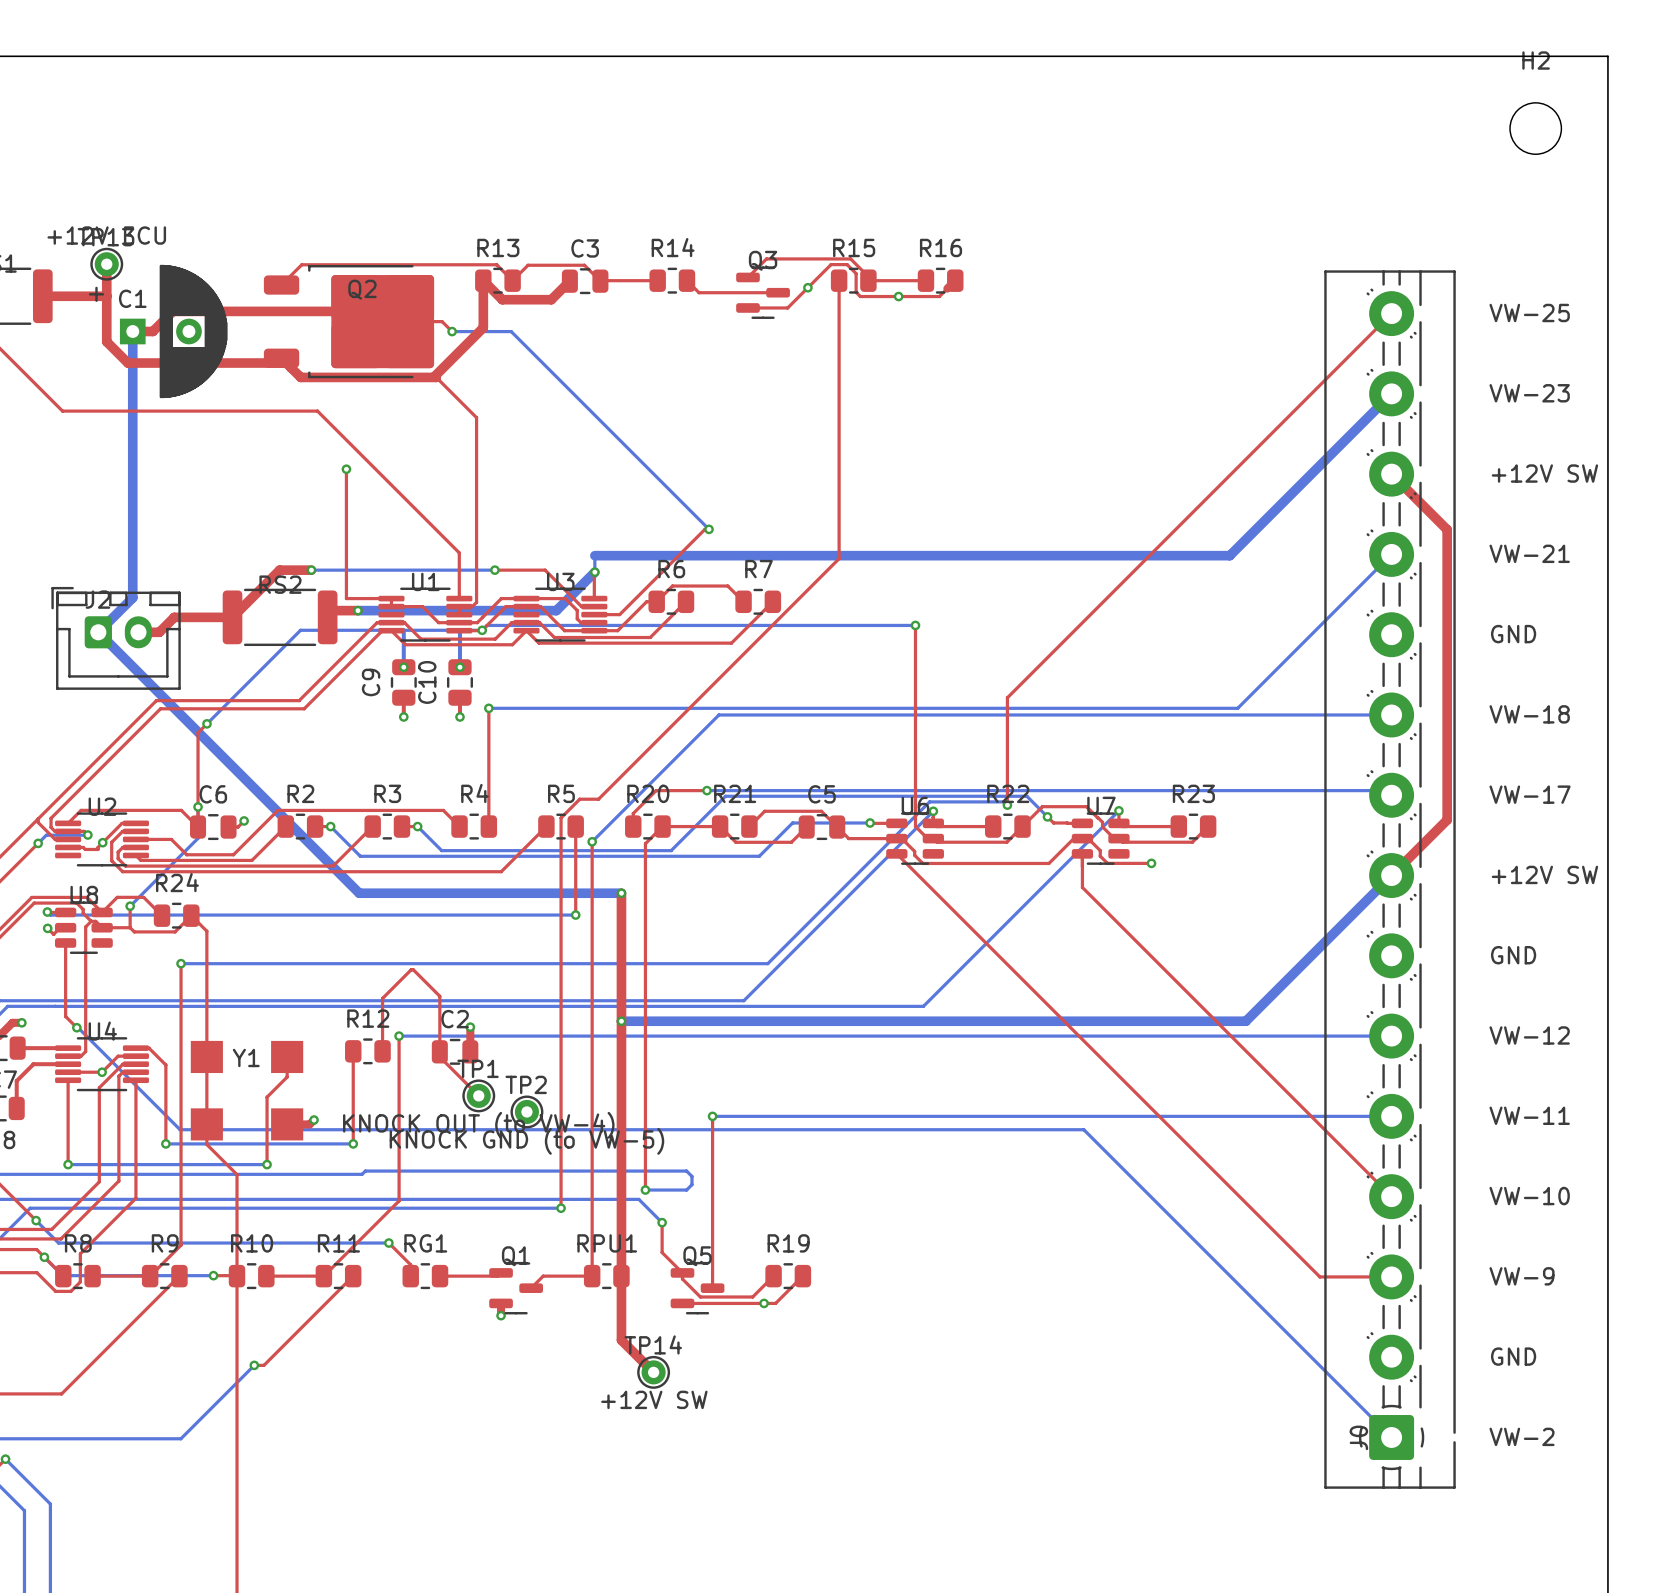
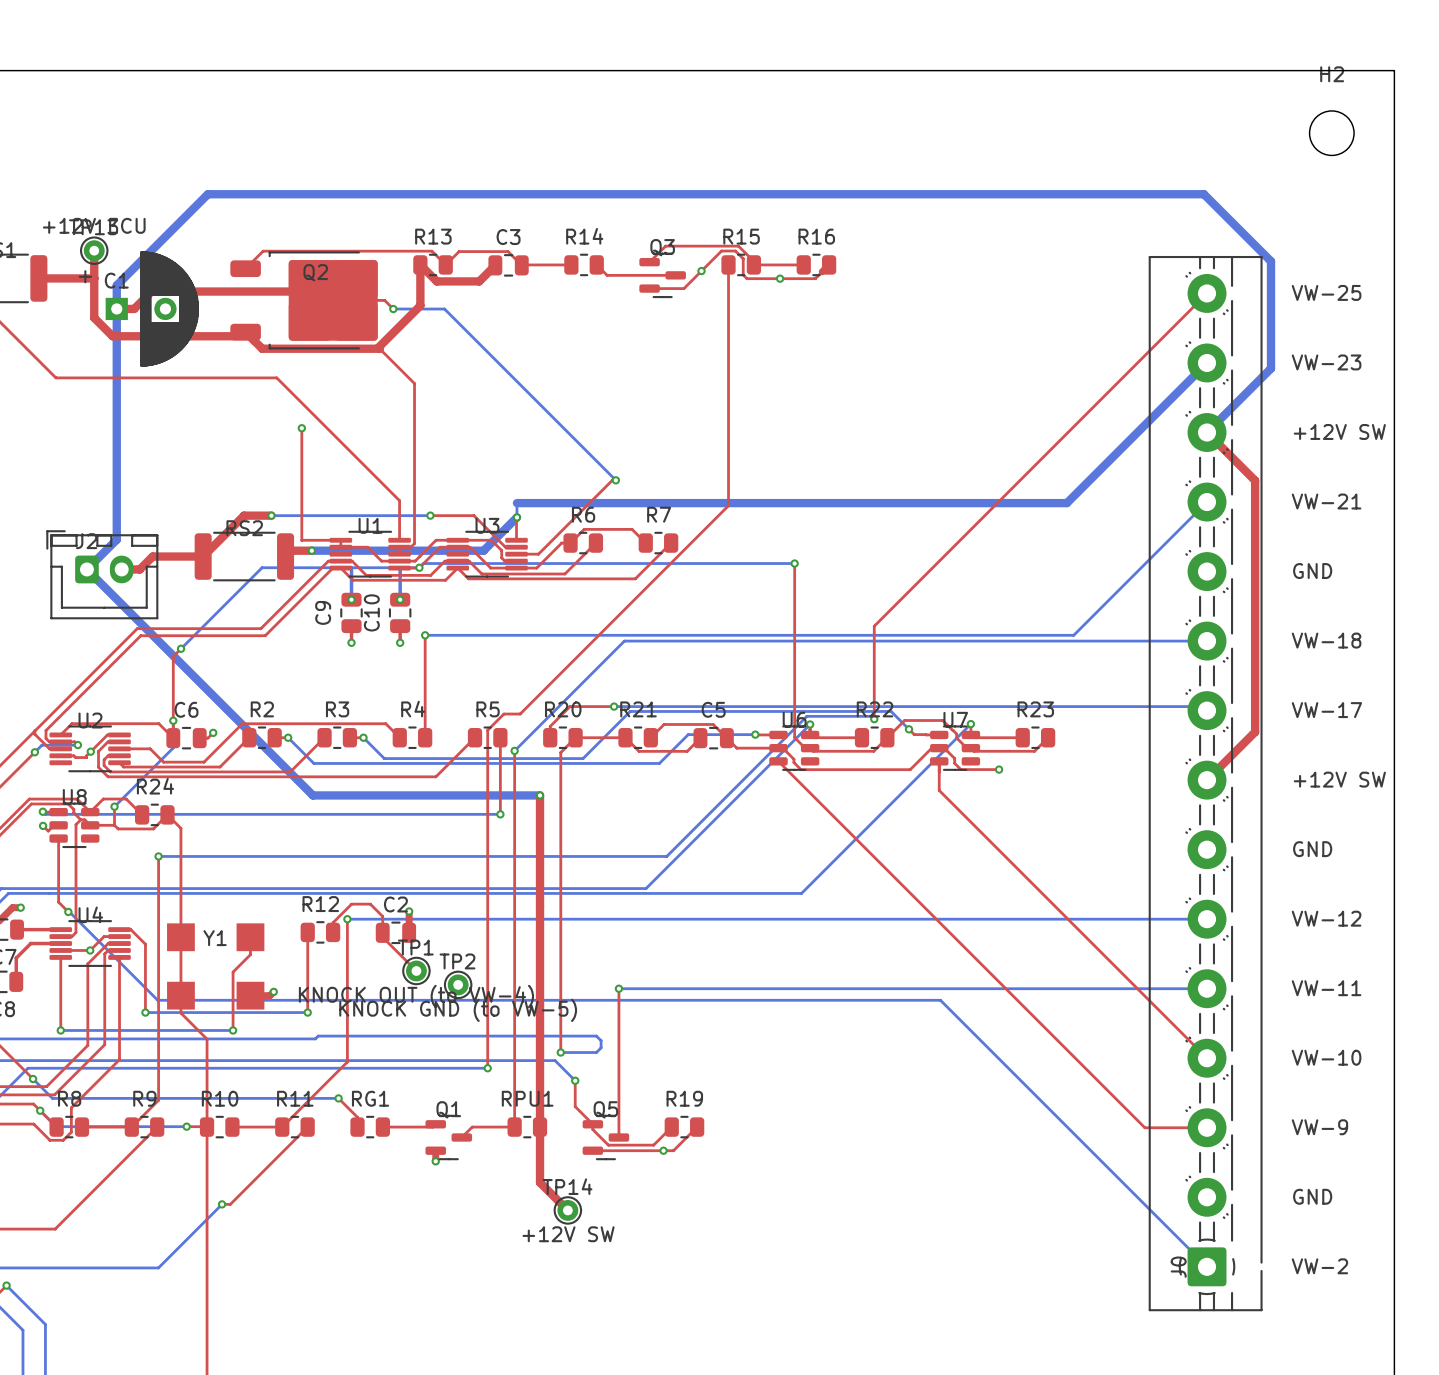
bottom track: none -> (116, 308) (116, 285) (207, 194) (1203, 194) (1271, 261) (1271, 368) (1207, 432)
bottom track: (1391, 875) (1245, 1021) (621, 1021) -> none
via: (621, 1021) -> none
top track: (439, 1032) (439, 996) (411, 969) (382, 998) (382, 1040) -> (382, 916) (370, 904) (351, 904) (333, 922)

